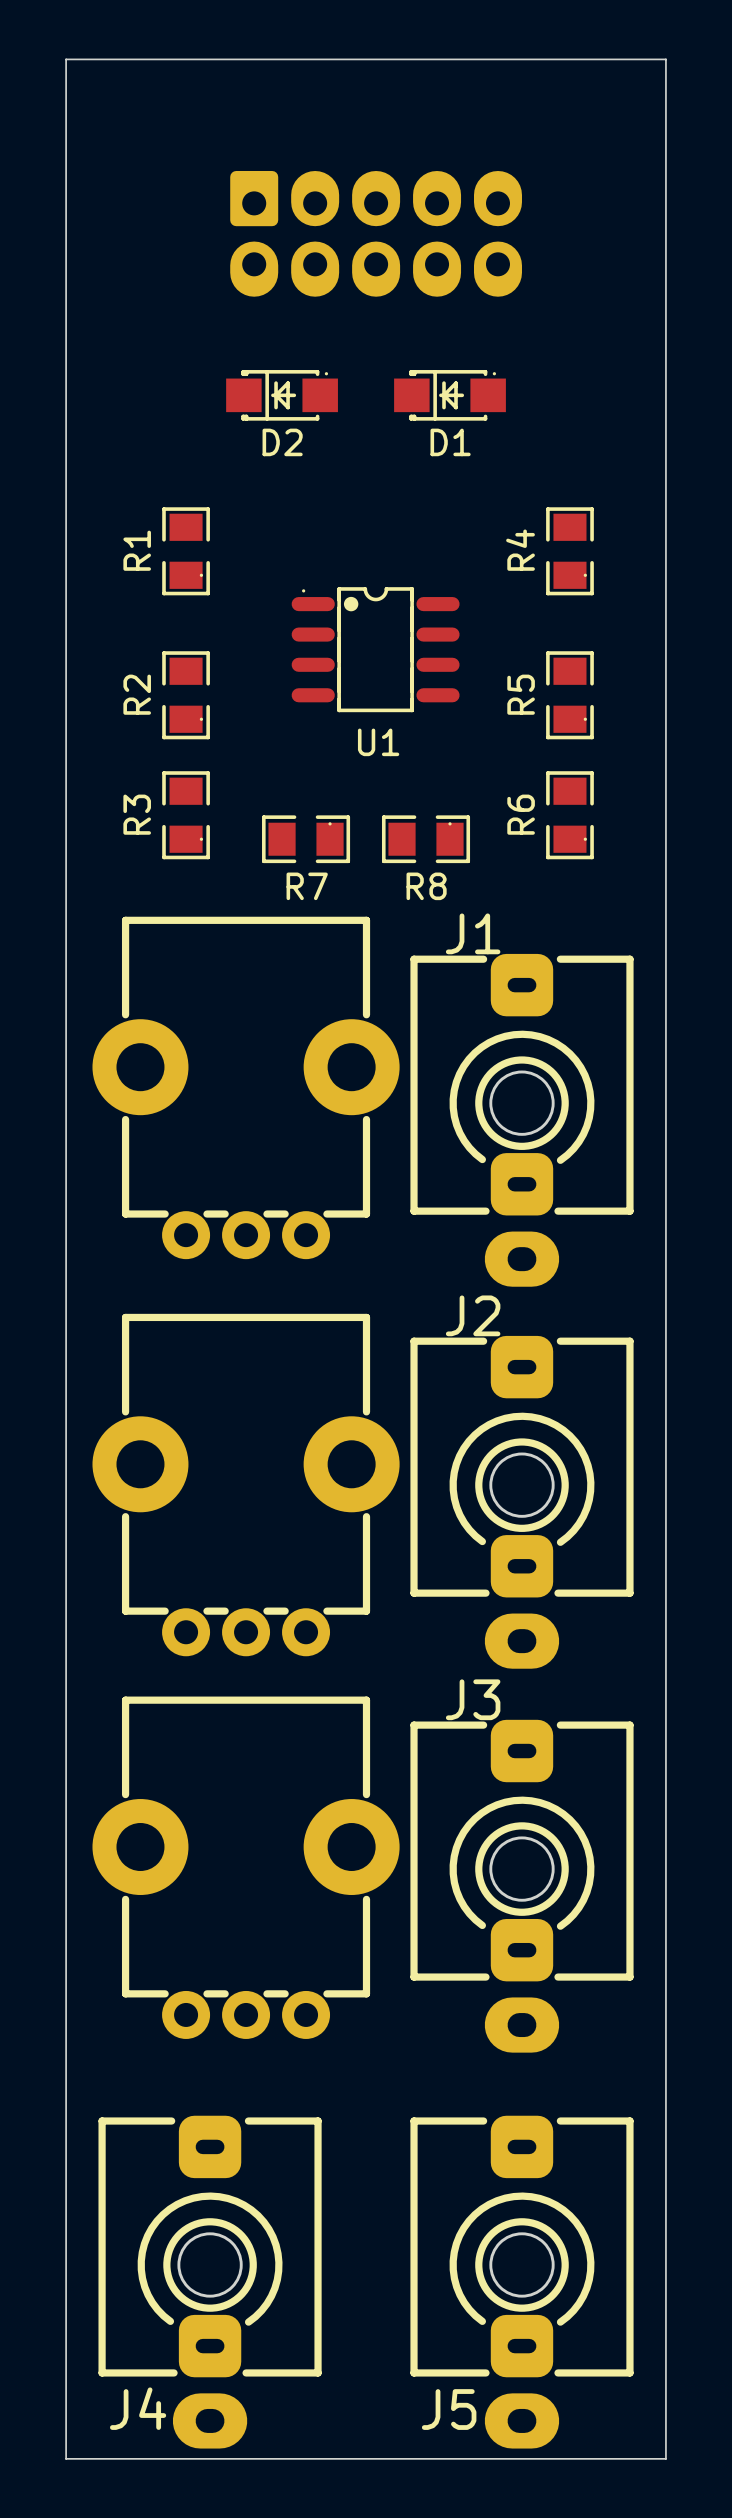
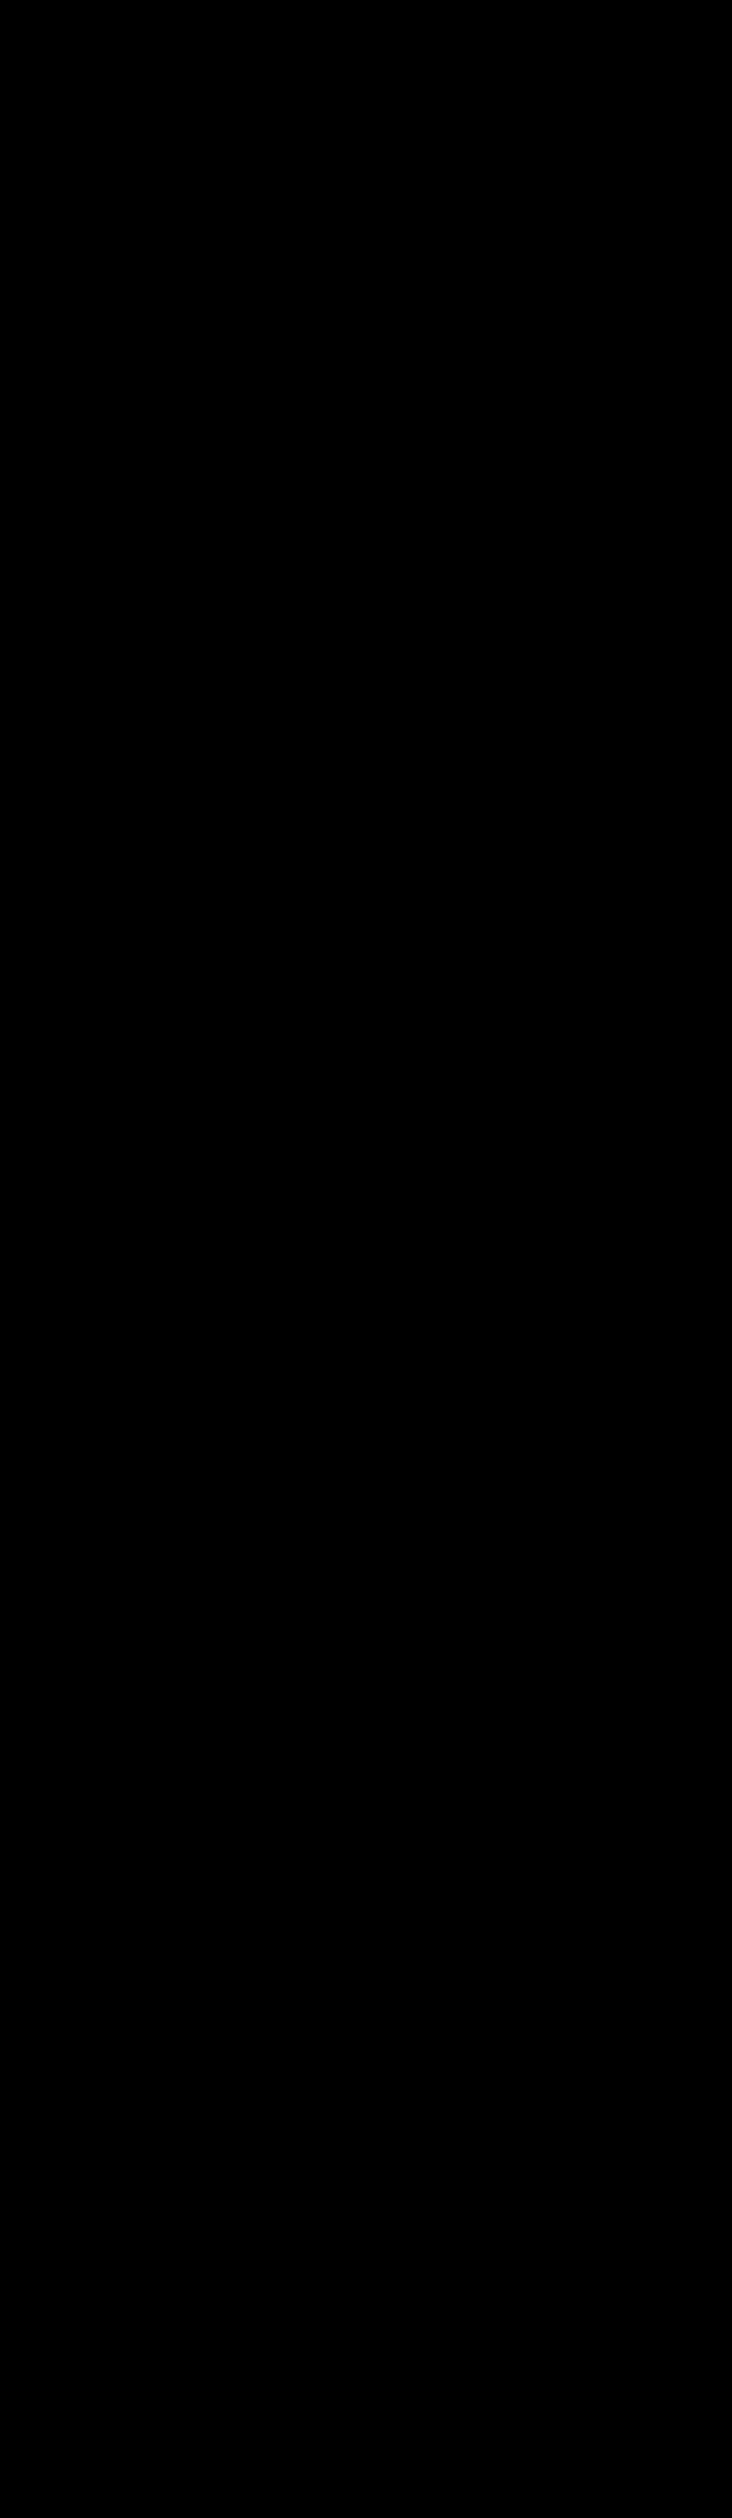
board edge: (66, 59) (665, 59) (665, 2458) (66, 2458) (66, 59) -> none
part: (376, 233) -> none
D2: (282, 395) -> none
D1: (450, 395) -> none
R1: (186, 551) -> none
R4: (569, 551) -> none
U1: (375, 649) -> none
R2: (186, 695) -> none
R5: (569, 695) -> none
R3: (186, 815) -> none
R6: (569, 815) -> none
R7: (306, 839) -> none
R8: (426, 839) -> none
part: (246, 1087) -> none
J1: (521, 1120) -> none
part: (246, 1485) -> none
J2: (521, 1502) -> none
part: (246, 1867) -> none
J3: (521, 1886) -> none
J4: (210, 2282) -> none
J5: (521, 2282) -> none

